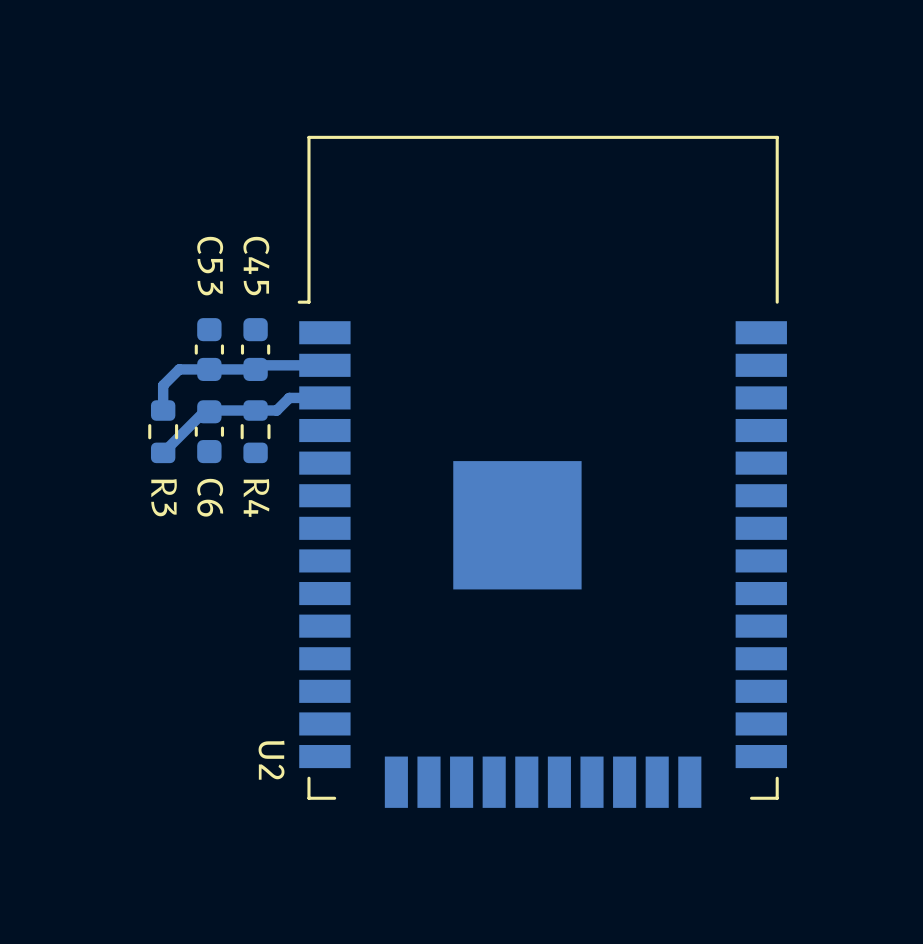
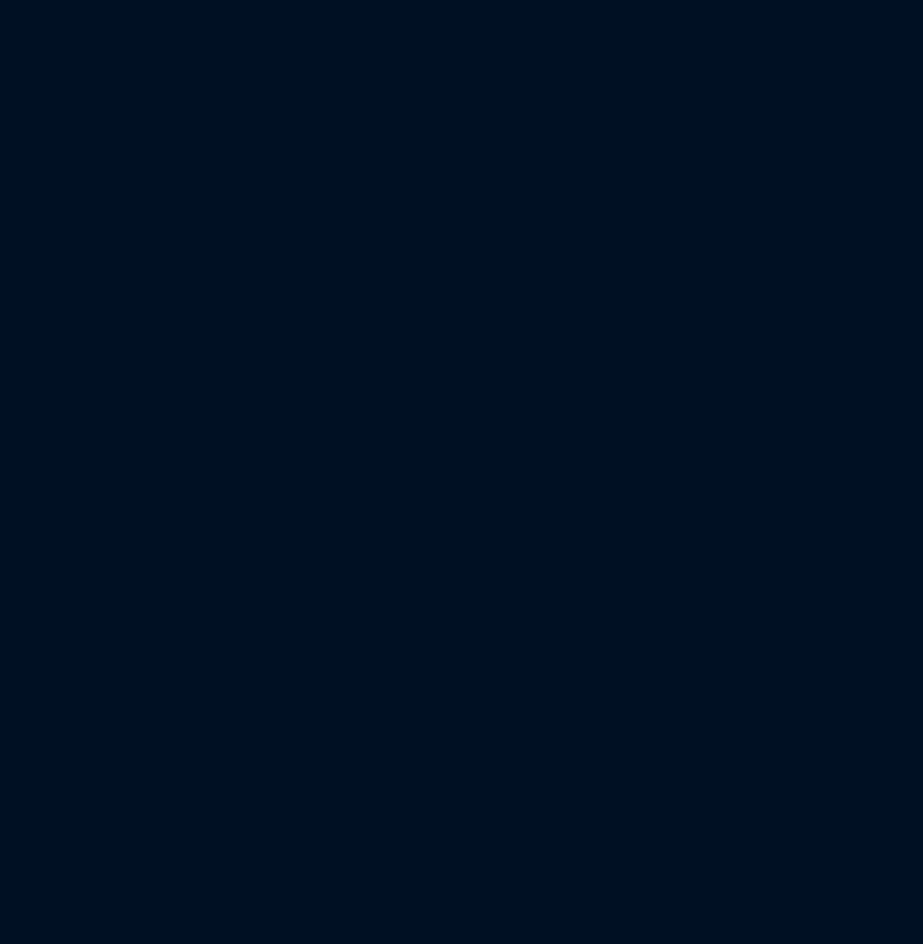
C53: (209, 349) -> none
C45: (255, 349) -> none
track: (324, 365) (259, 365) (255, 369) (179, 369) (163, 385) (163, 410) -> none
track: (324, 397) (289, 397) (276, 410) (204, 411) (163, 452) -> none
R3: (163, 431) -> none
C6: (209, 431) -> none
R4: (255, 431) -> none
U2: (542, 471) -> none

